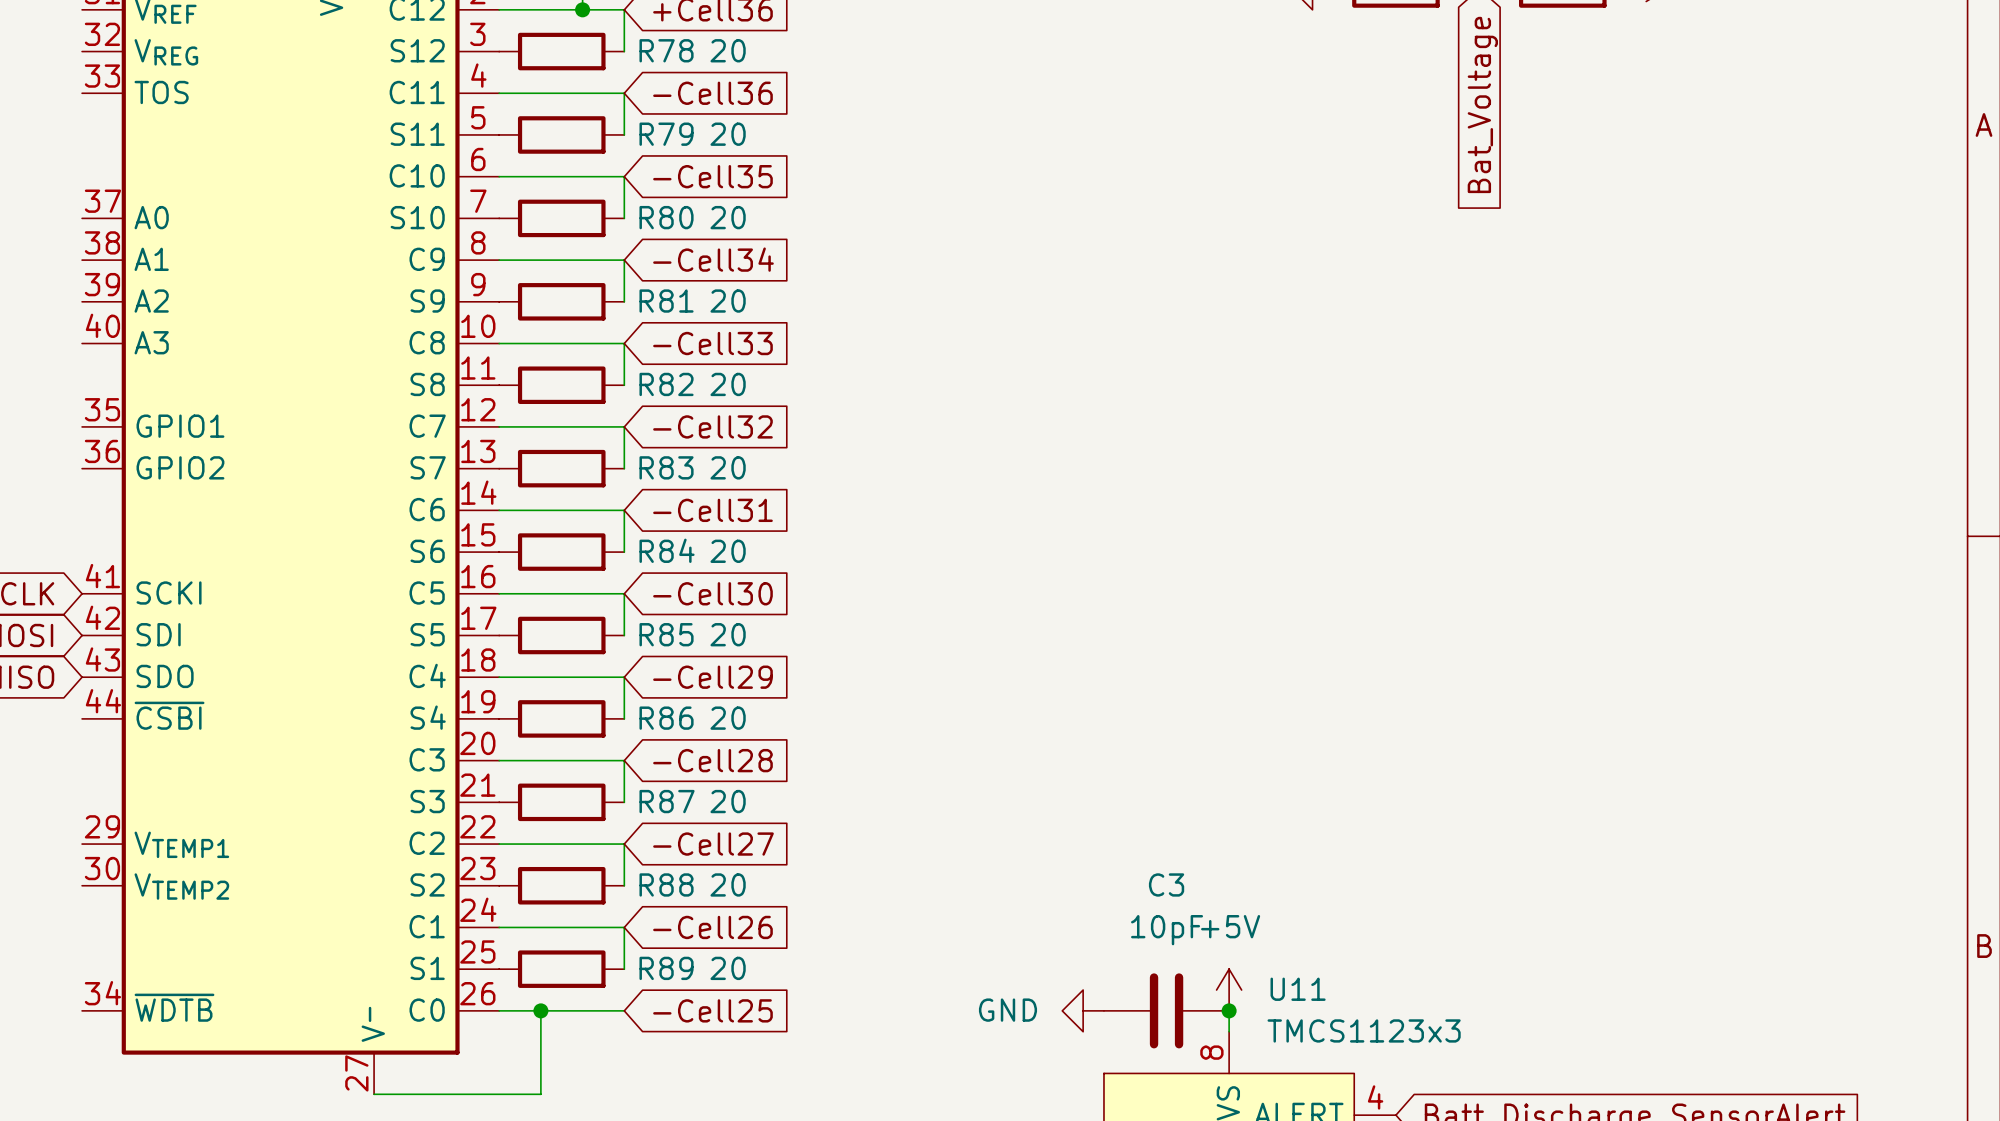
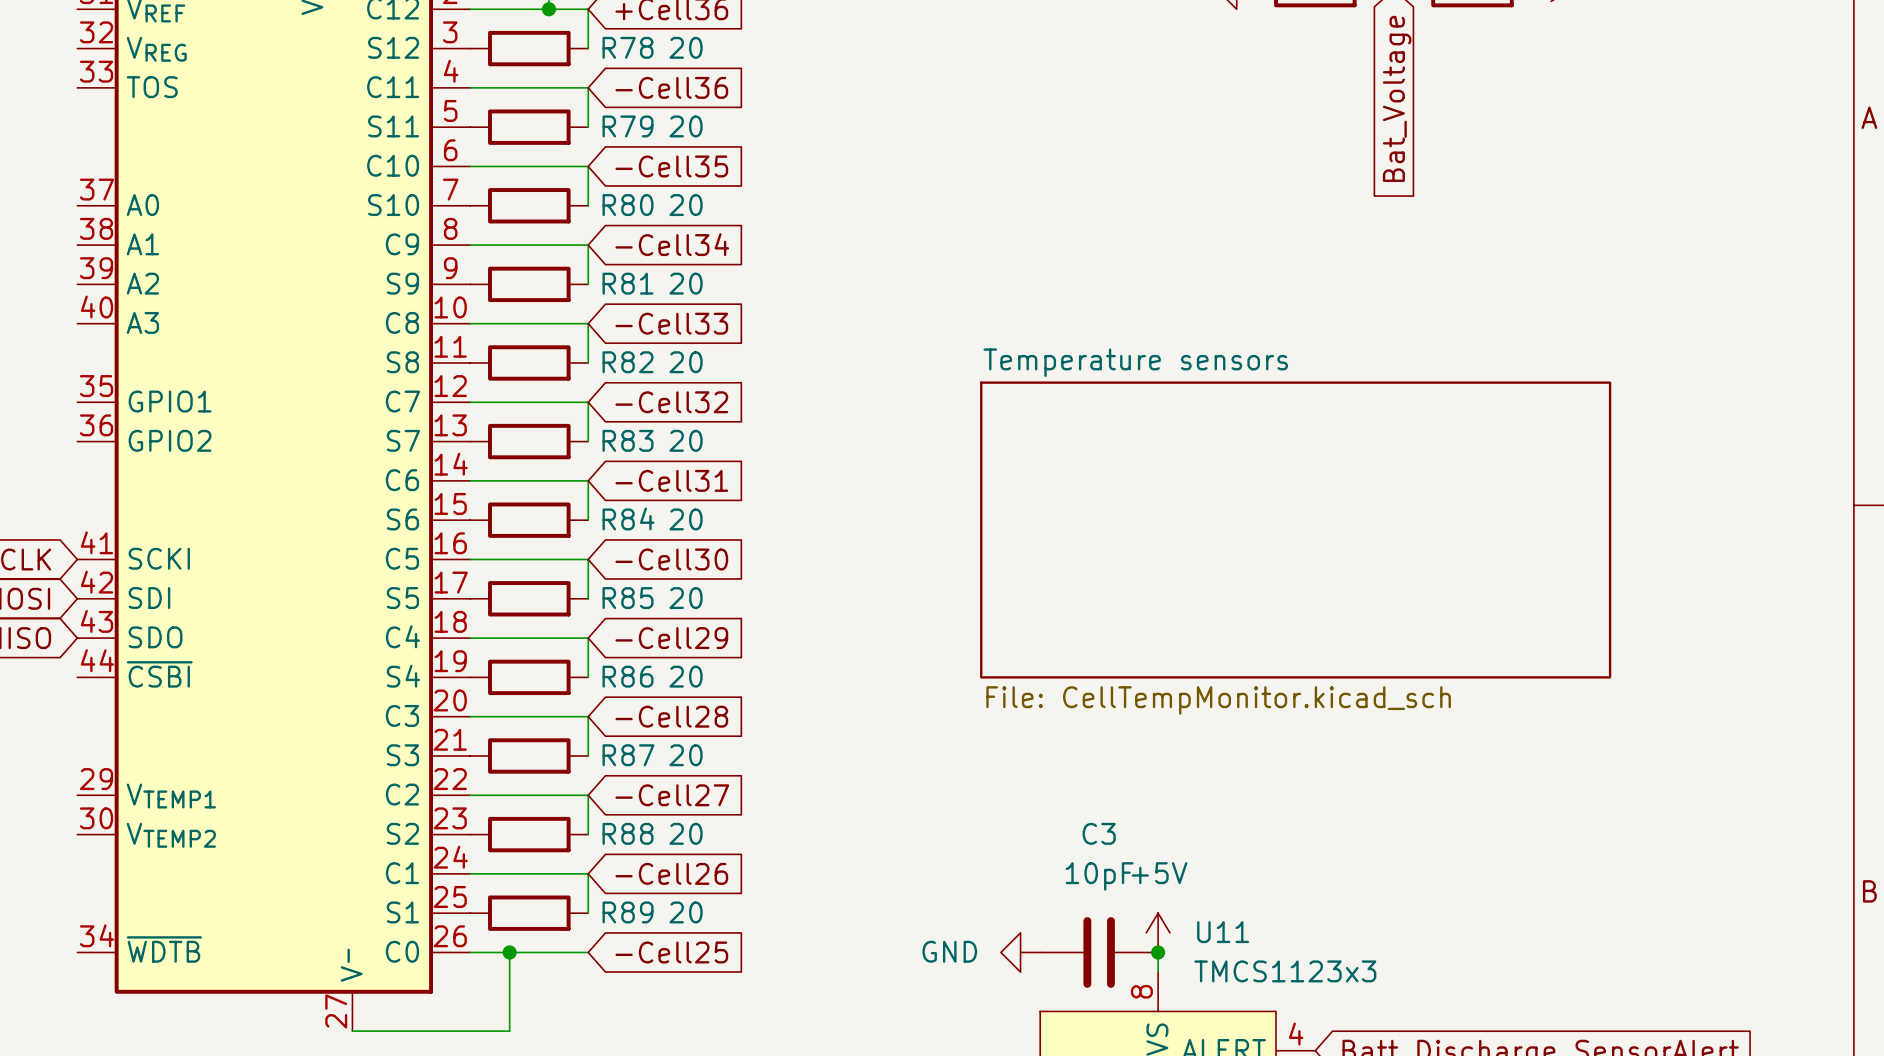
sheet Temperature sensors: none -> File: CellTempMonitor.kicad_sch (1295, 530)

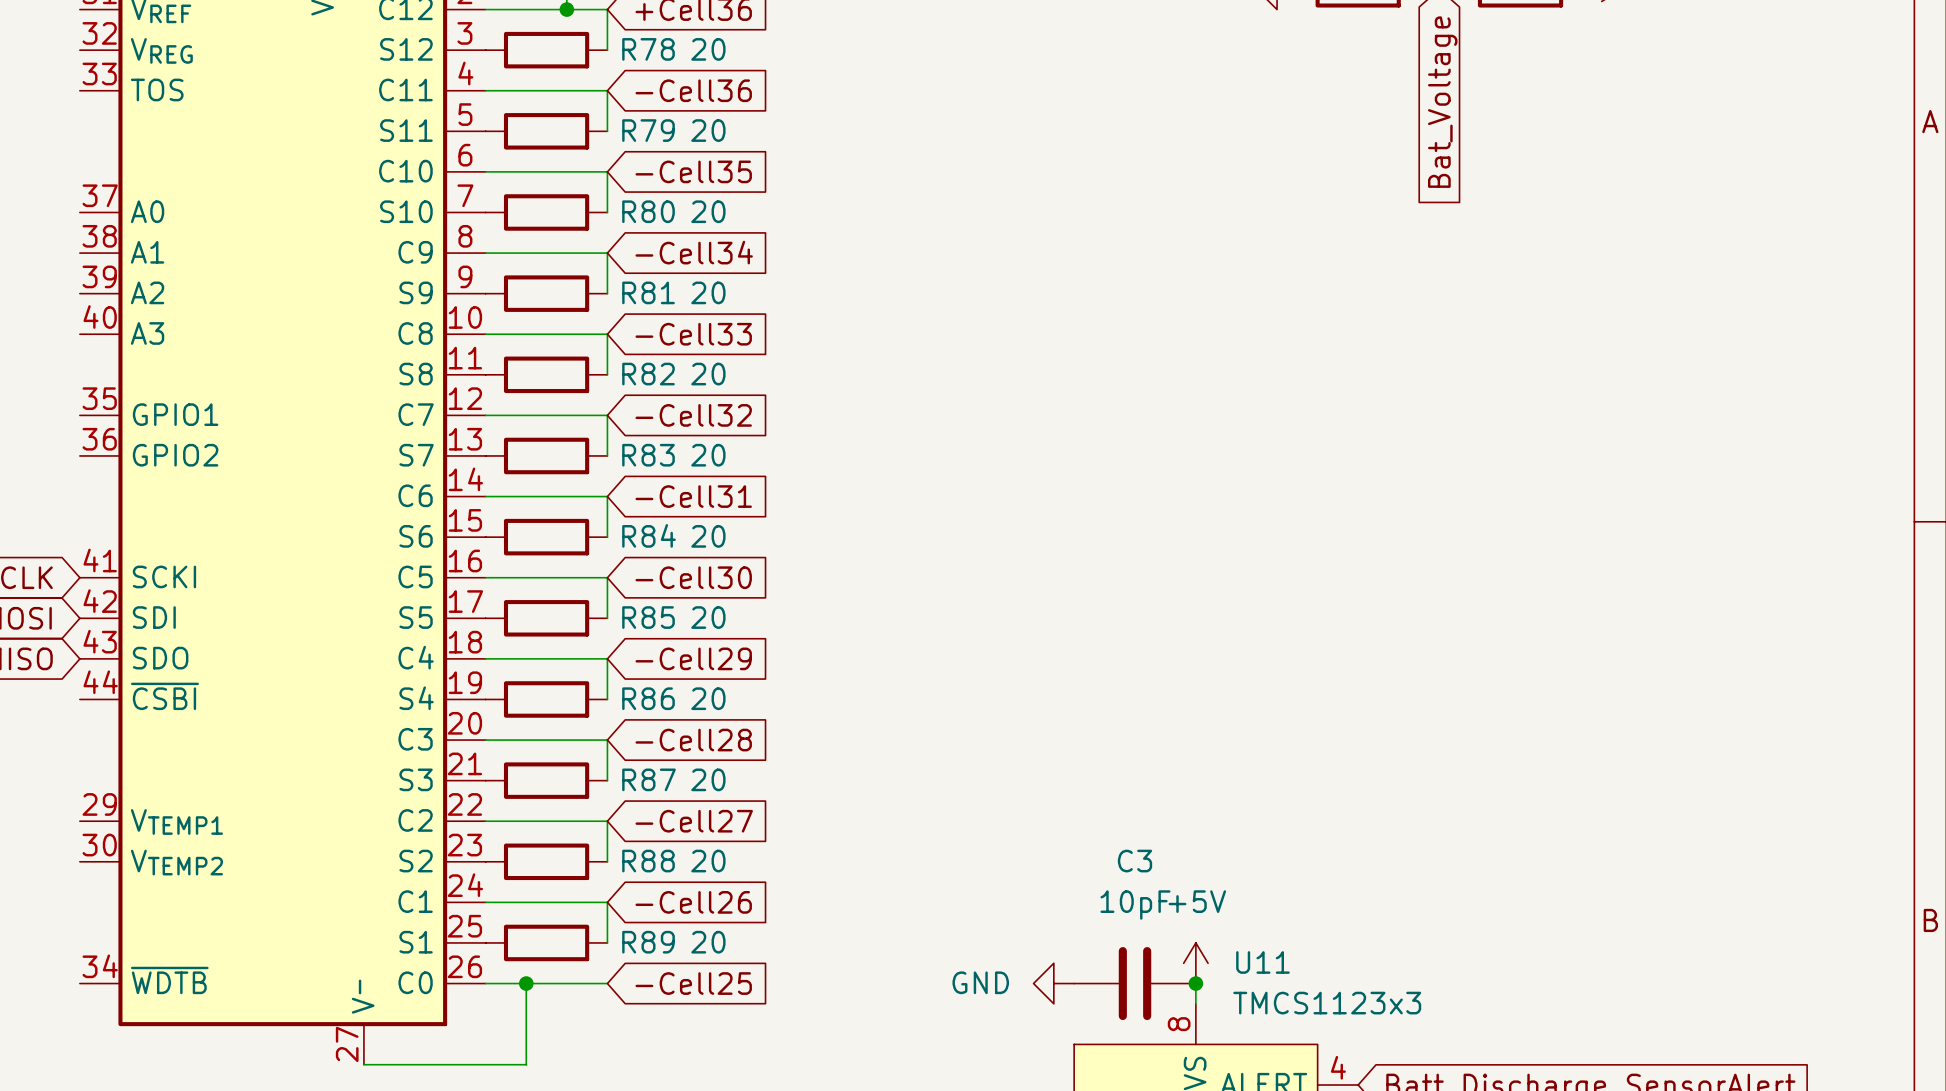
sheet Temperature sensors: File: CellTempMonitor.kicad_sch (1295, 530) -> none

